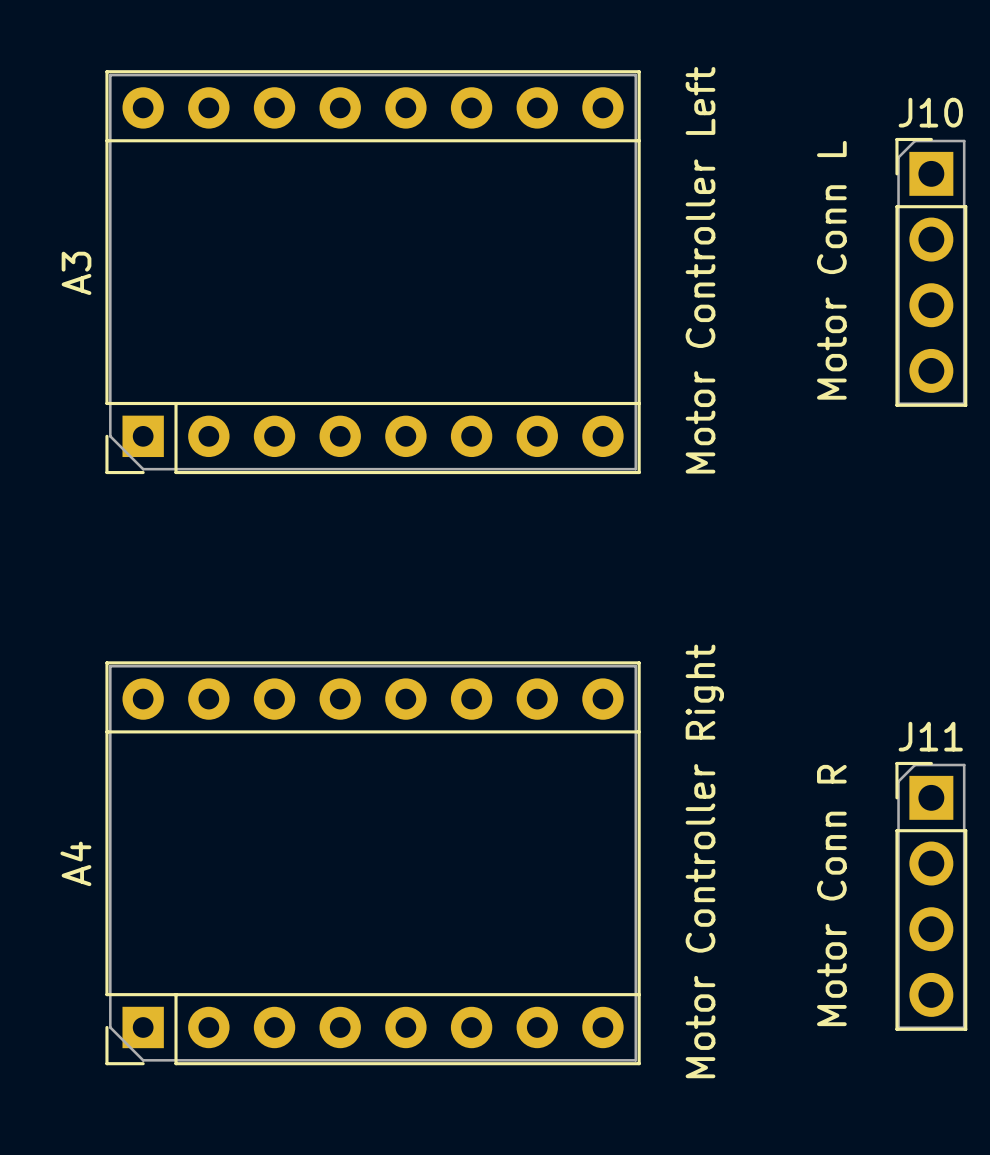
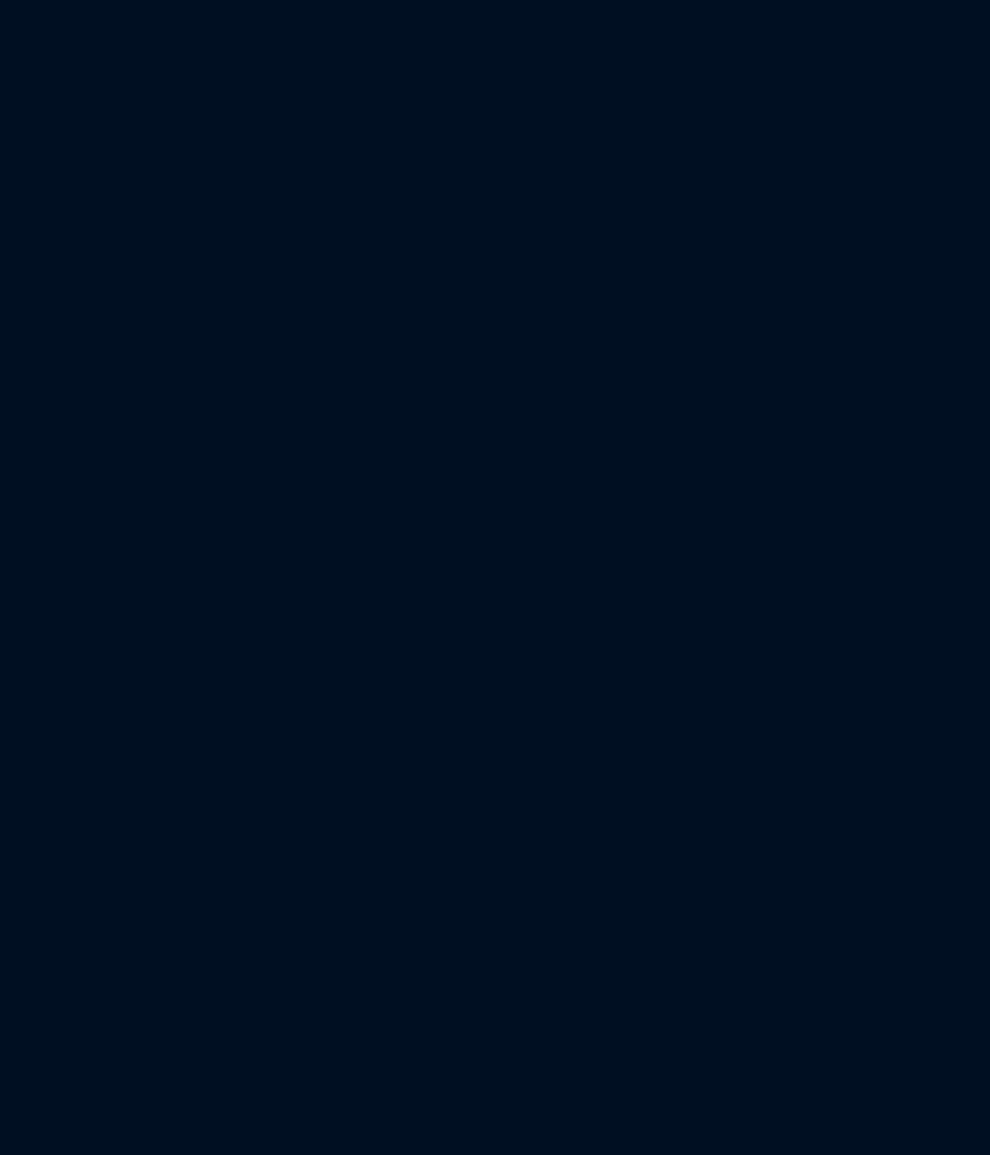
A3: Motor Controller Left (373, 272) -> none
J10: Motor Conn L (931, 272) -> none
A4: Motor Controller Right (373, 863) -> none
J11: Motor Conn R (931, 896) -> none

